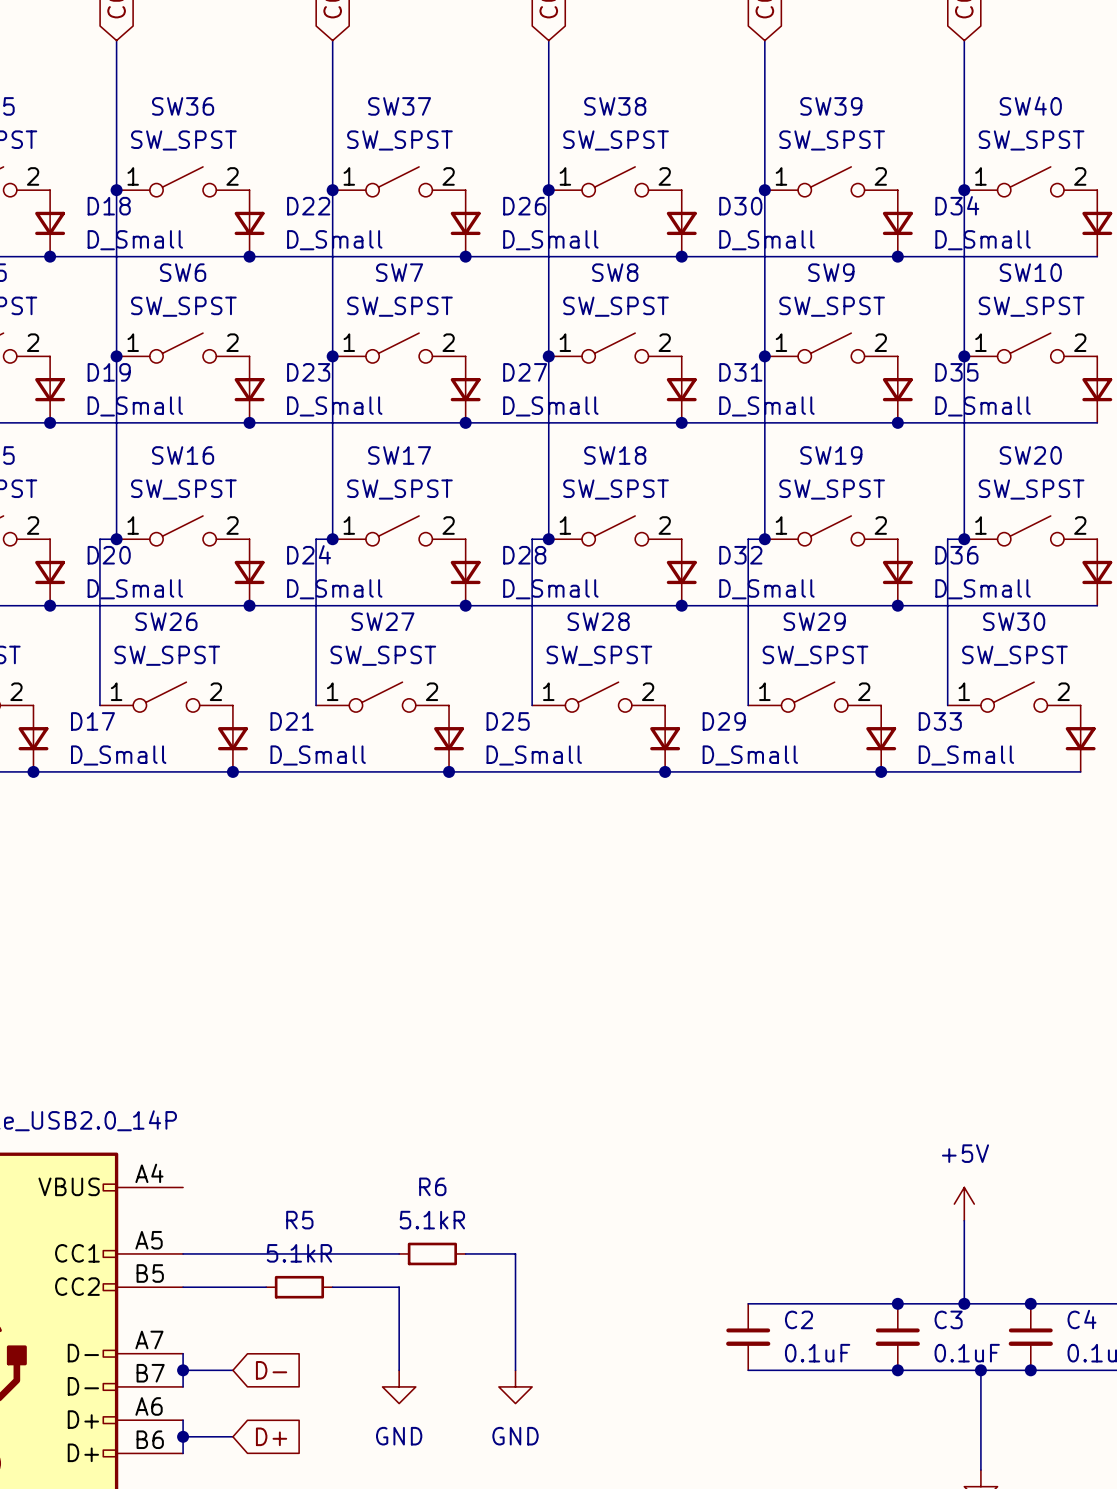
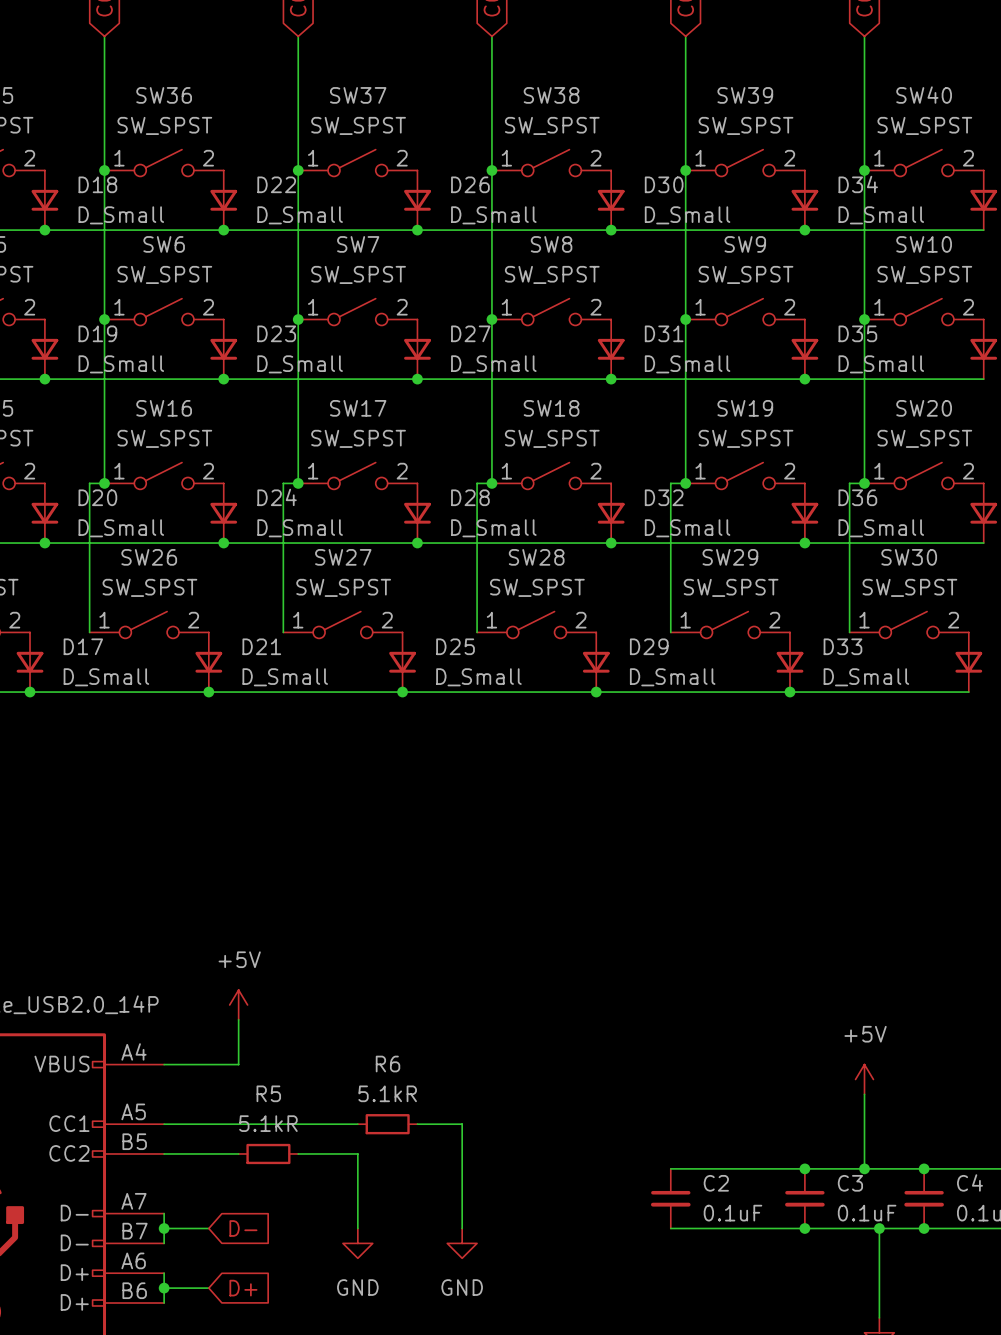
power symbol: none -> +5V (238, 1004)
wire: none -> (238, 1019) (238, 1064) (164, 1064)

